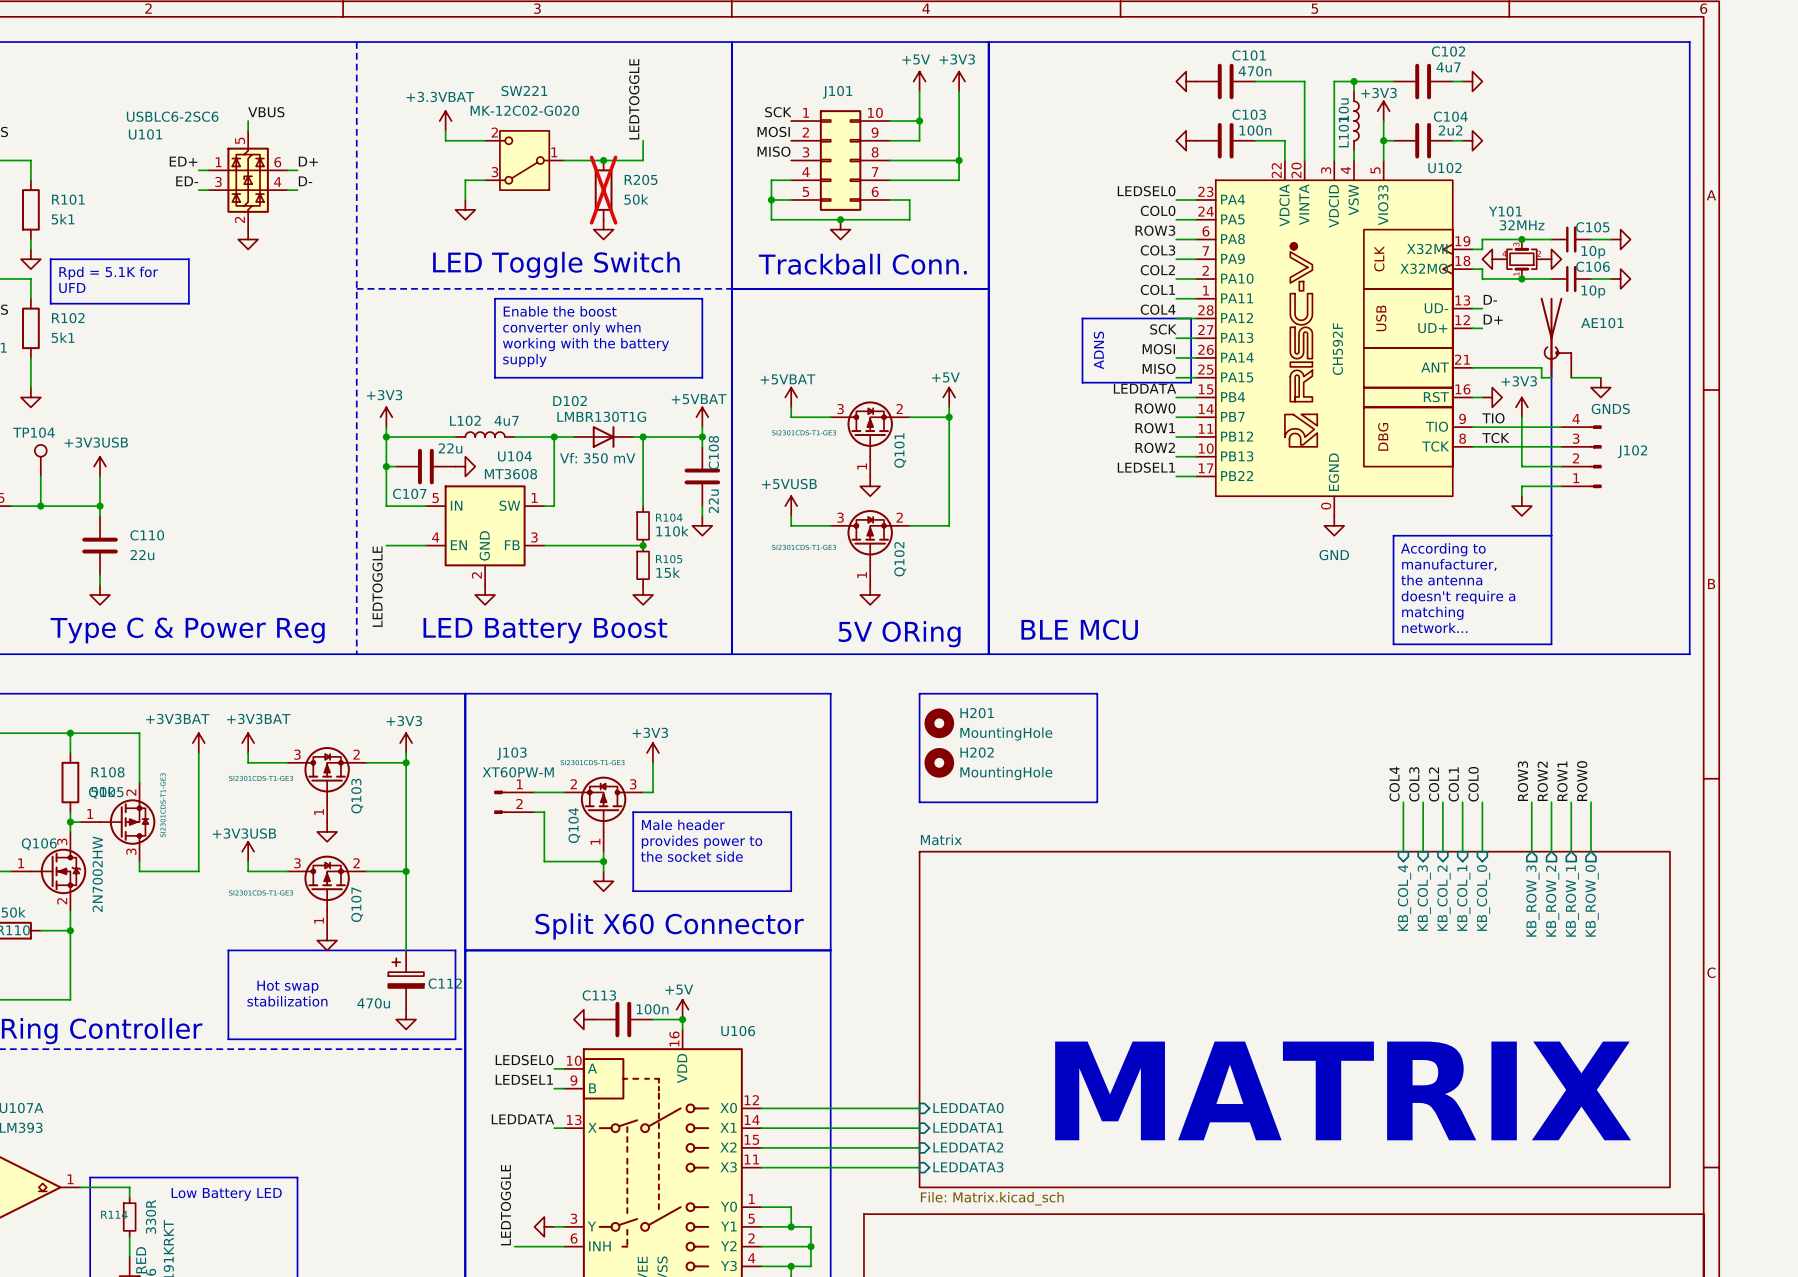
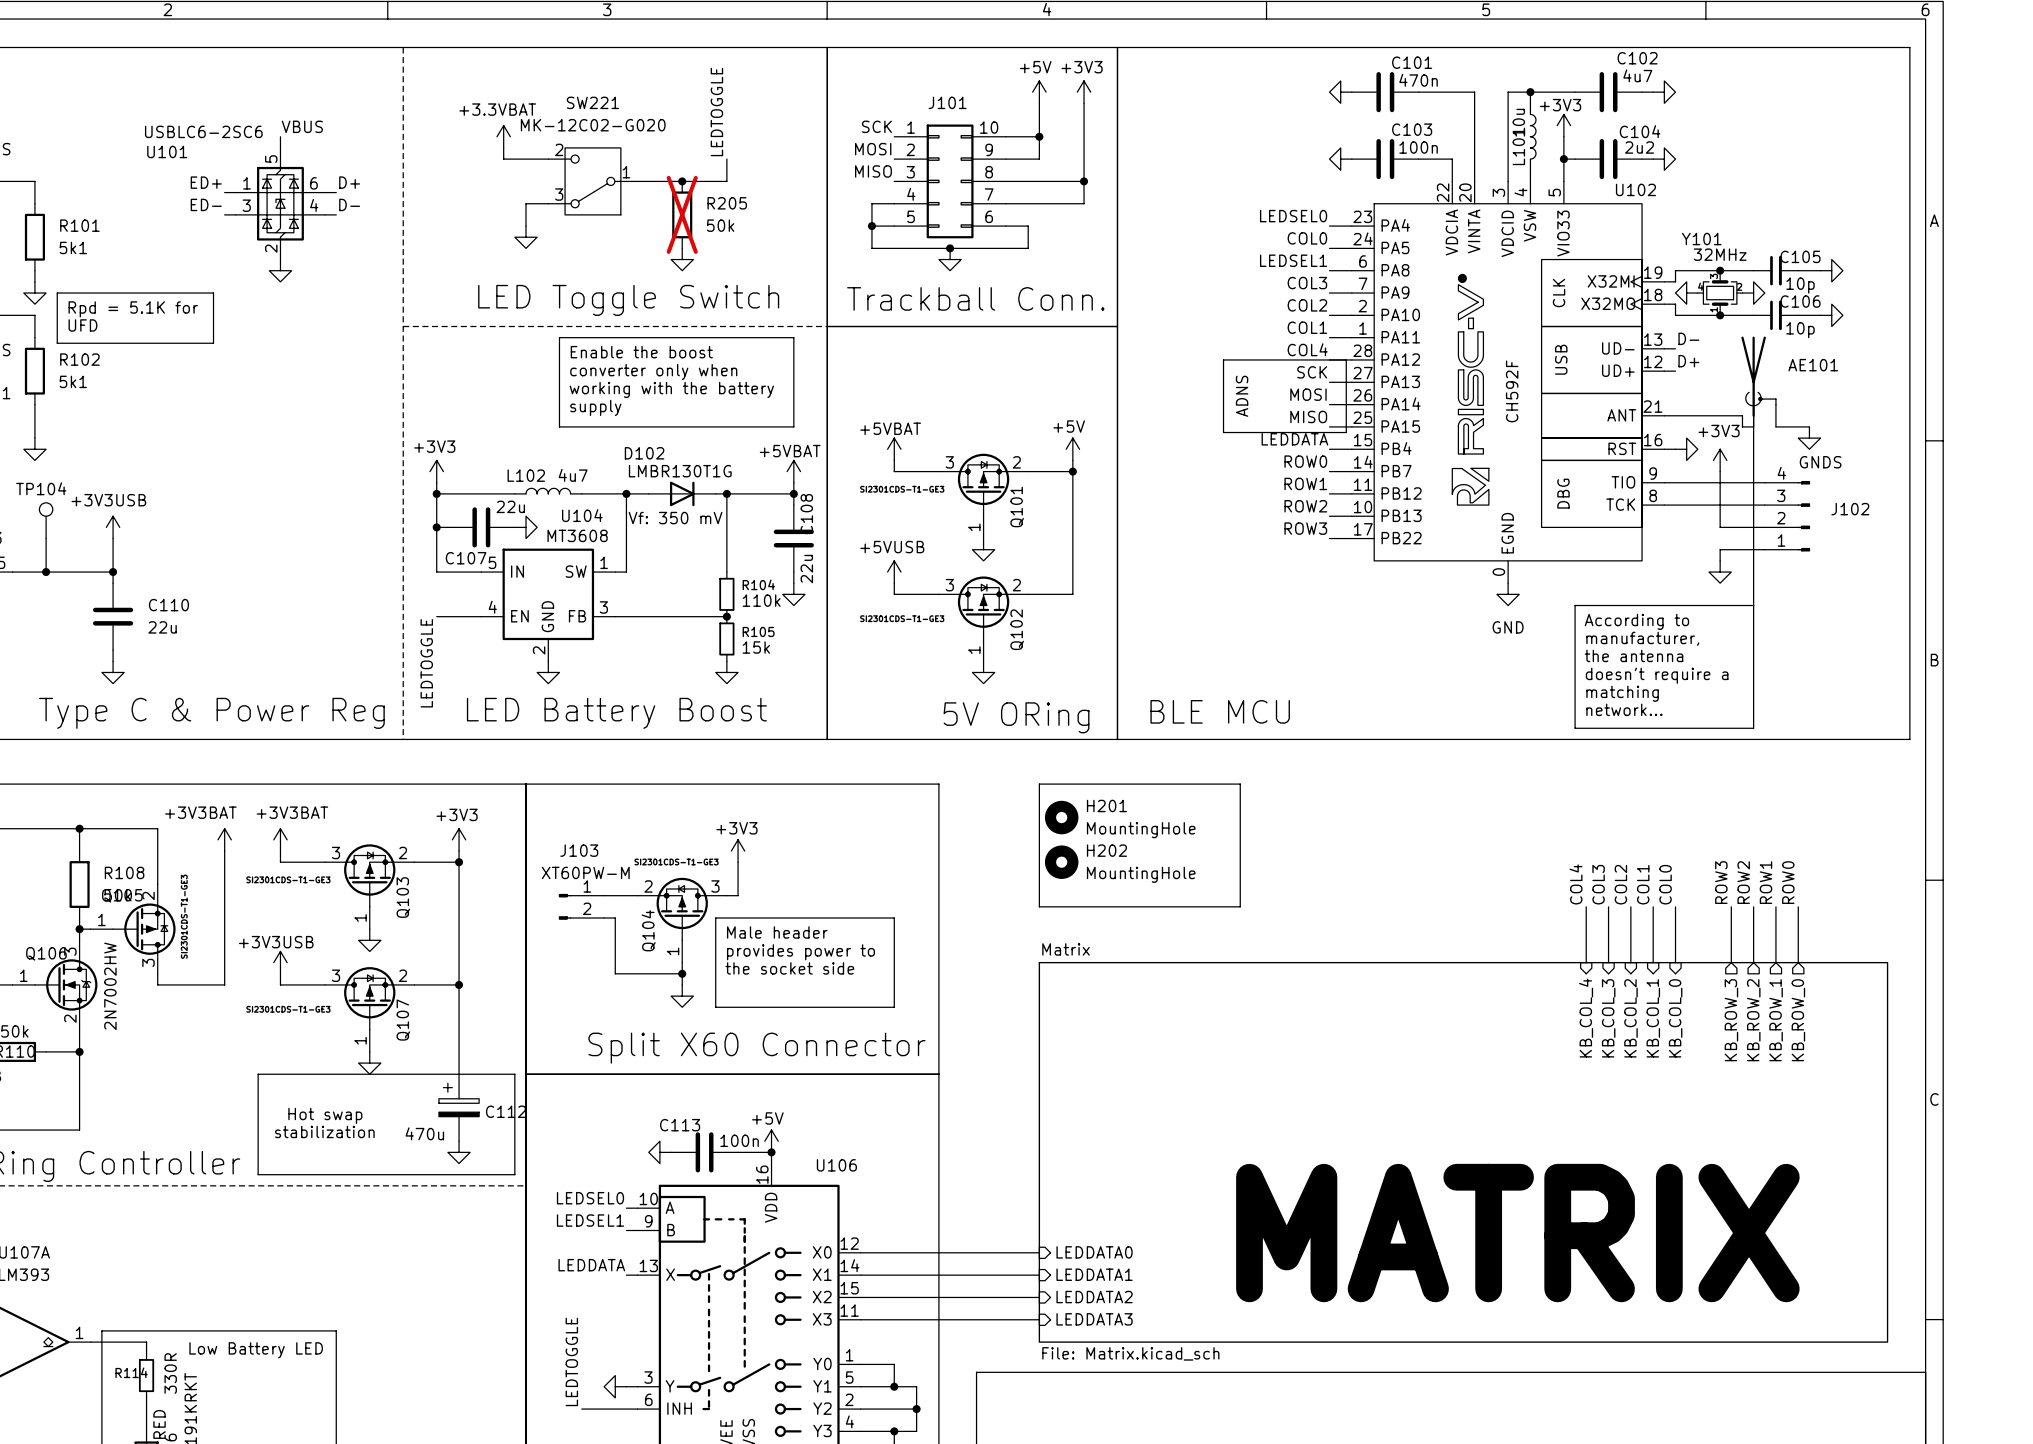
label: ROW3 (1155, 230) -> LEDSEL1 (1293, 260)
label: TIO (1493, 418) -> none
label: TCK (1495, 438) -> none
label: LEDSEL1 (1146, 467) -> ROW3 (1305, 528)

